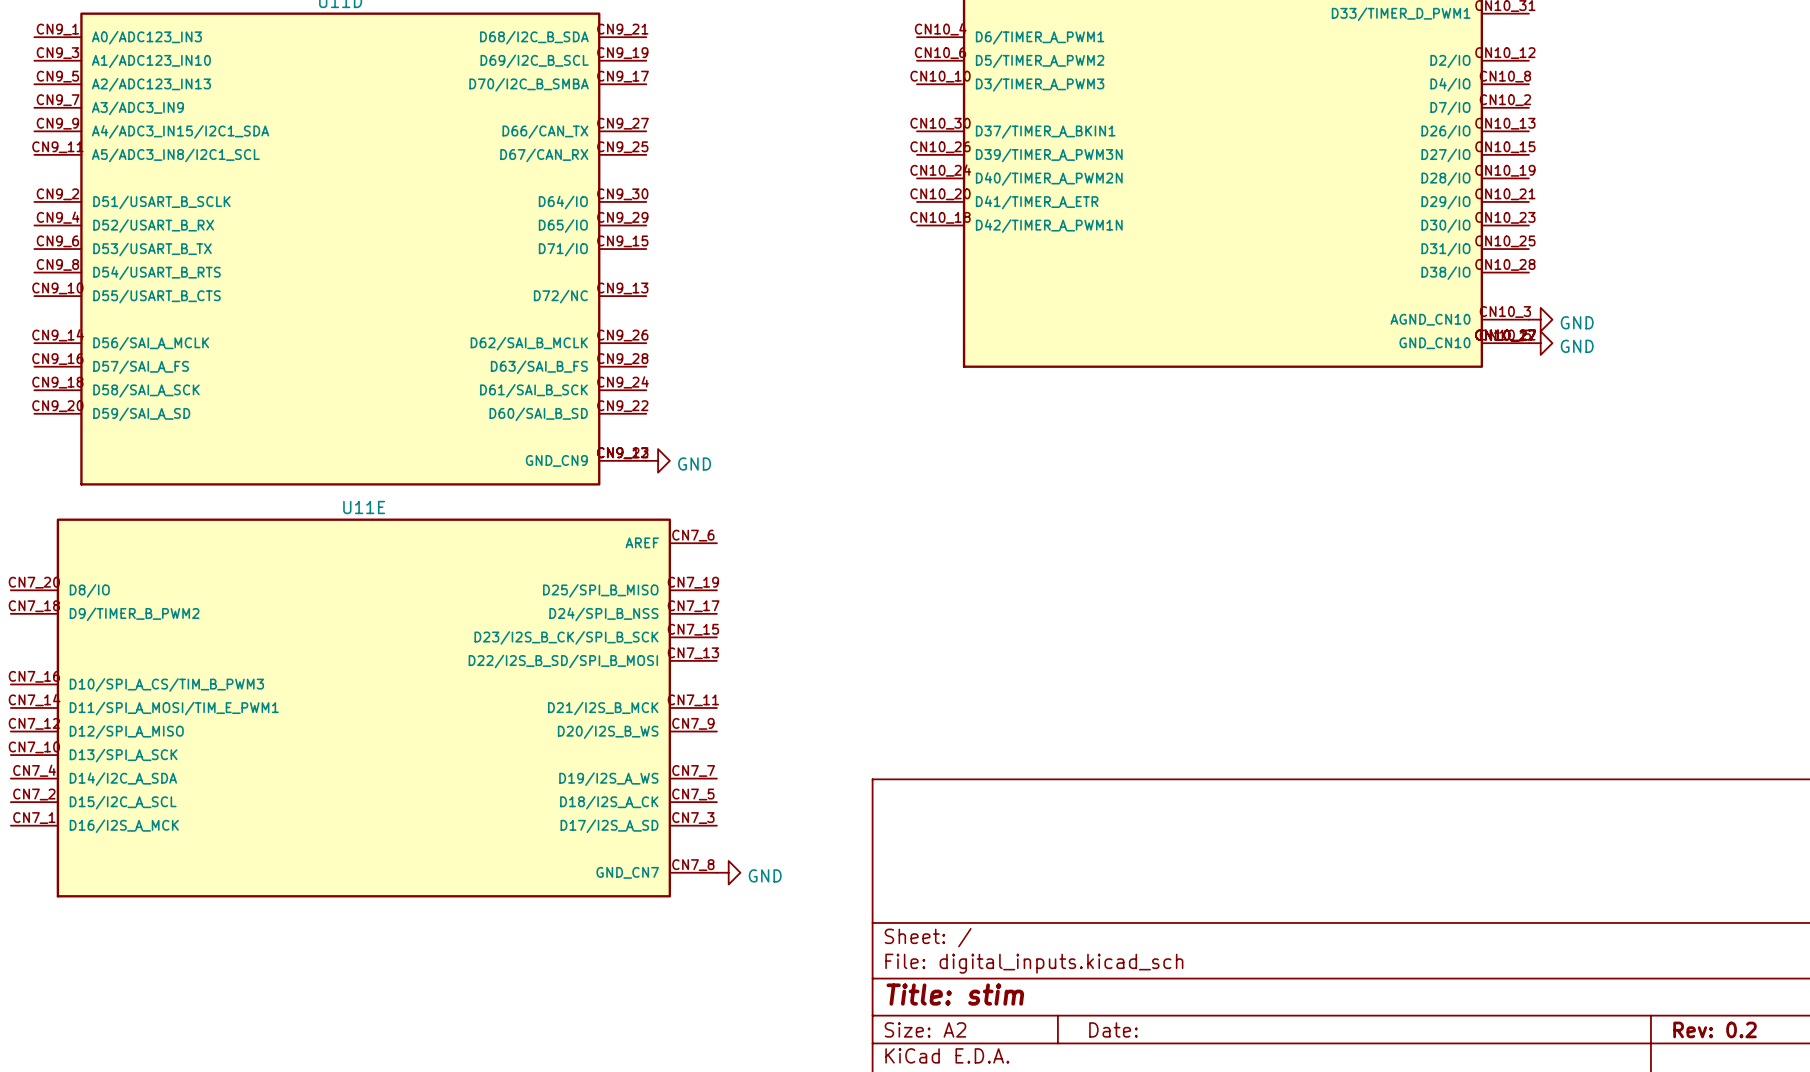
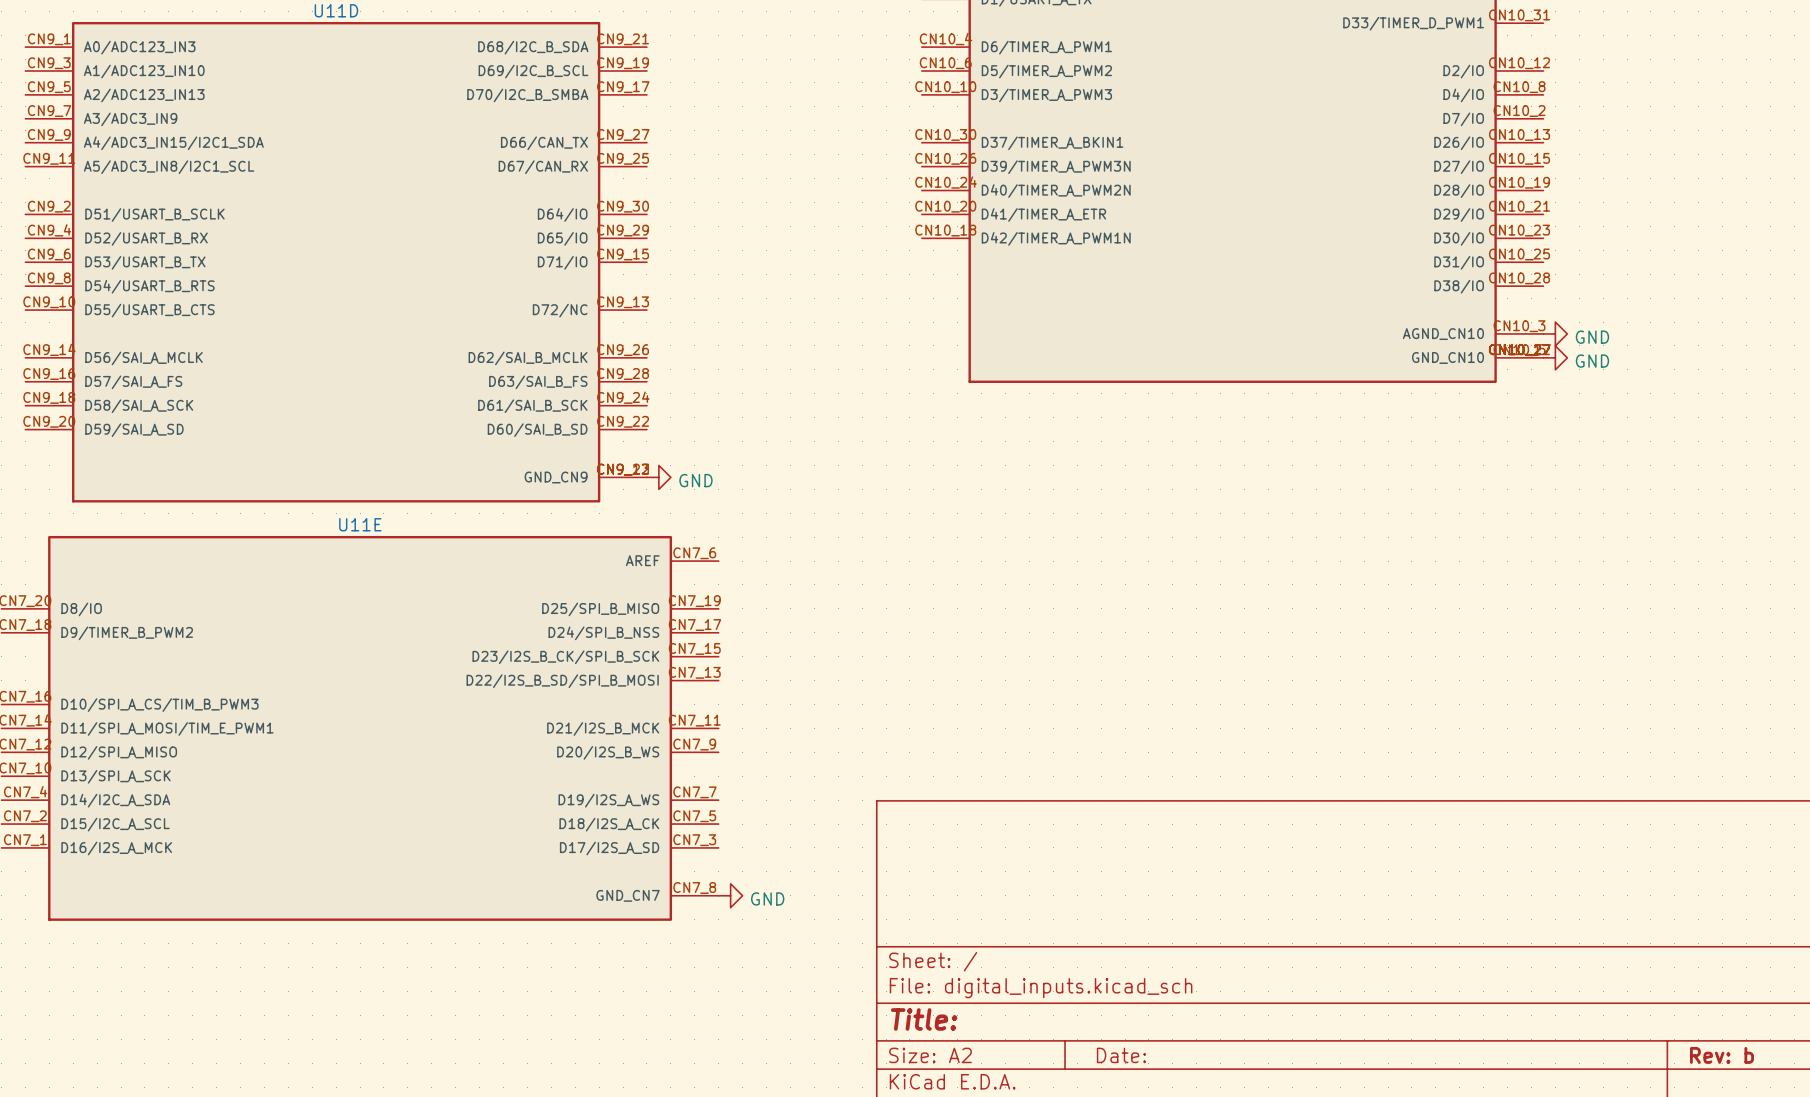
title block: Title: stim (955, 994) -> Title: (924, 1019)
title block: Rev: 0.2 (1715, 1029) -> Rev: b (1722, 1055)

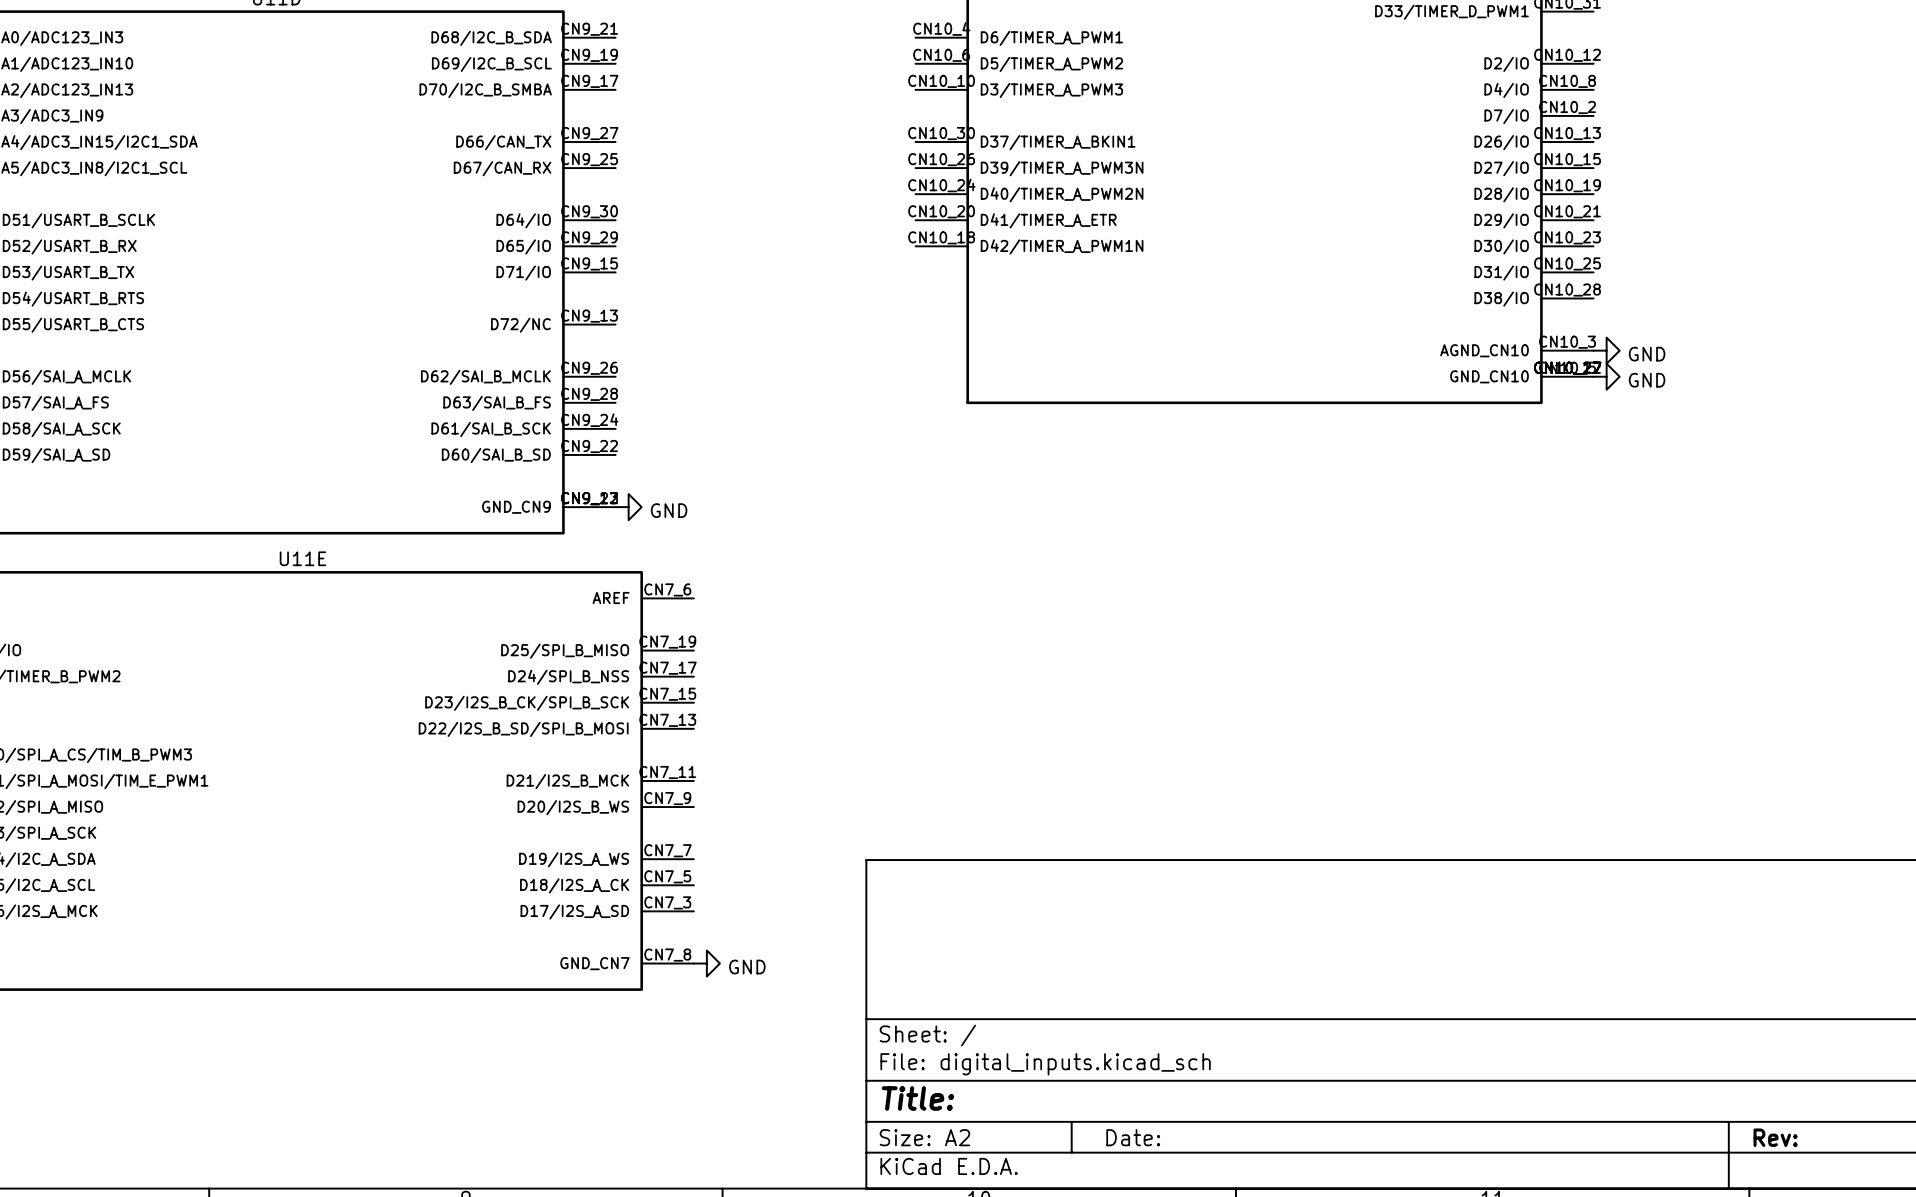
title block: Rev: b (1722, 1055) -> Rev: (1775, 1137)

